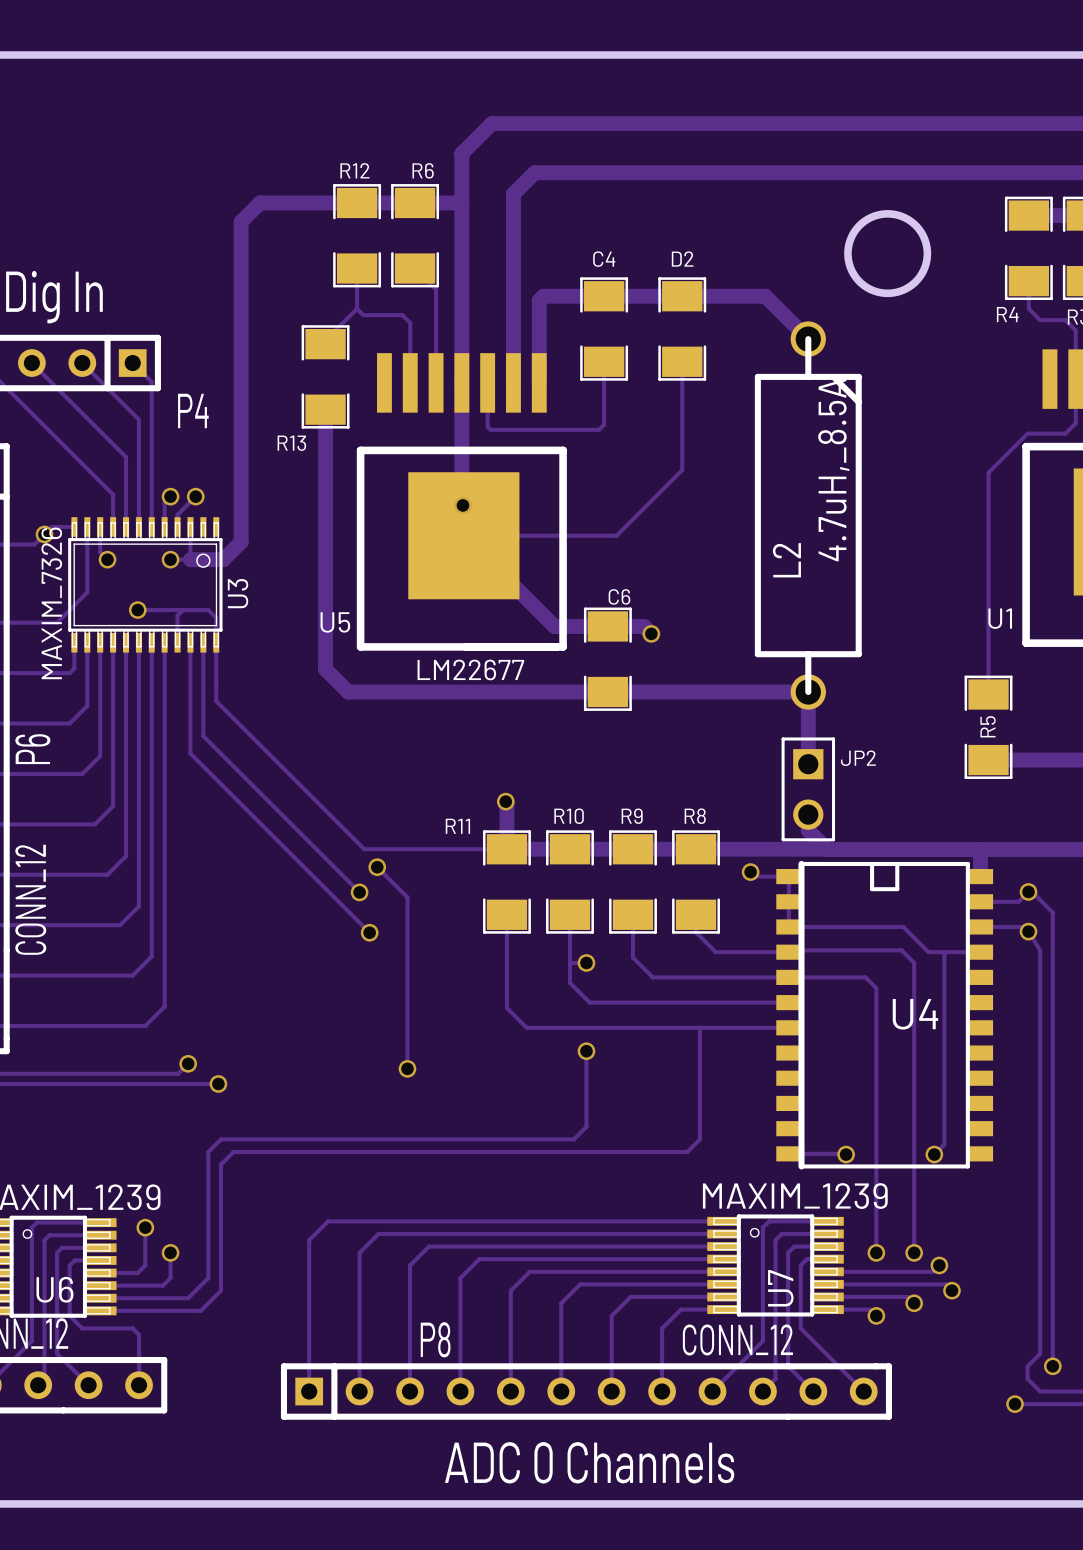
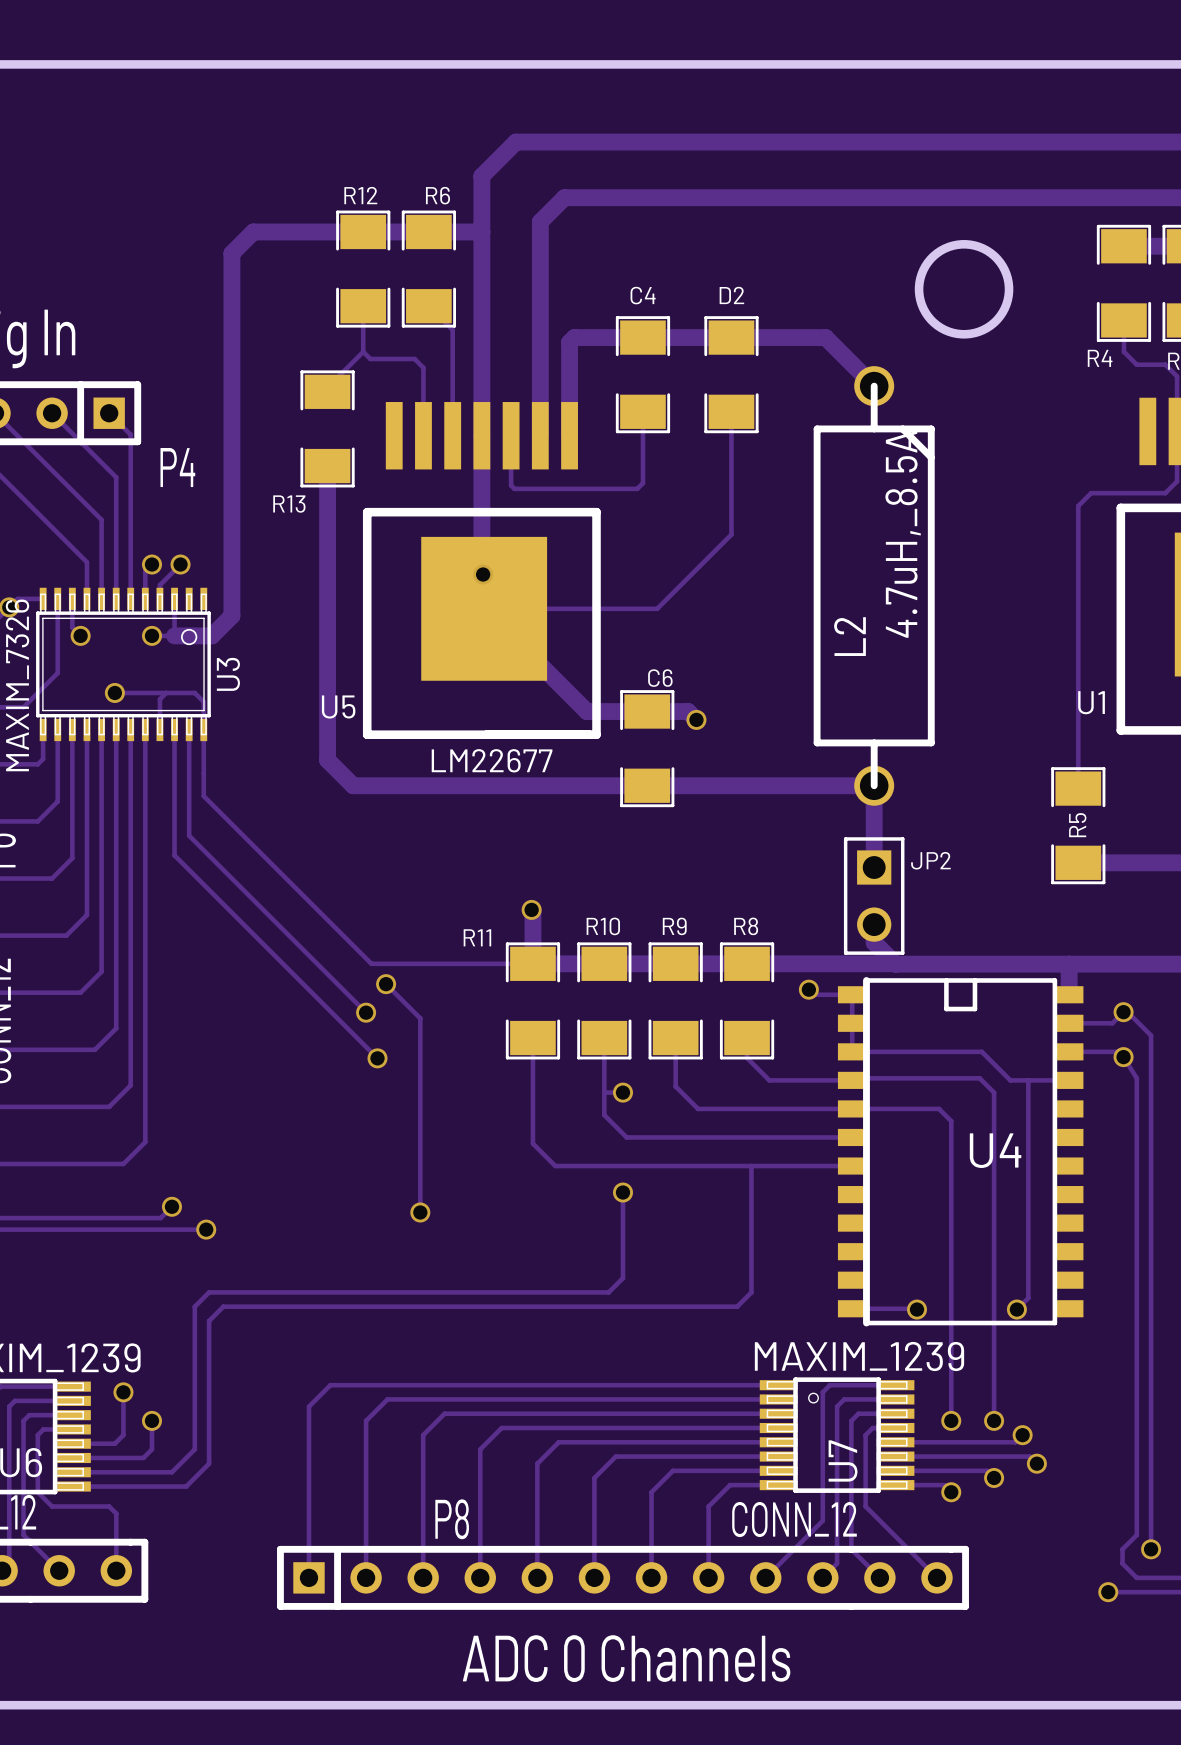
track: (1027, 433) (988, 472) -> (1122, 493) (1091, 493) (1078, 506) (1078, 537)

